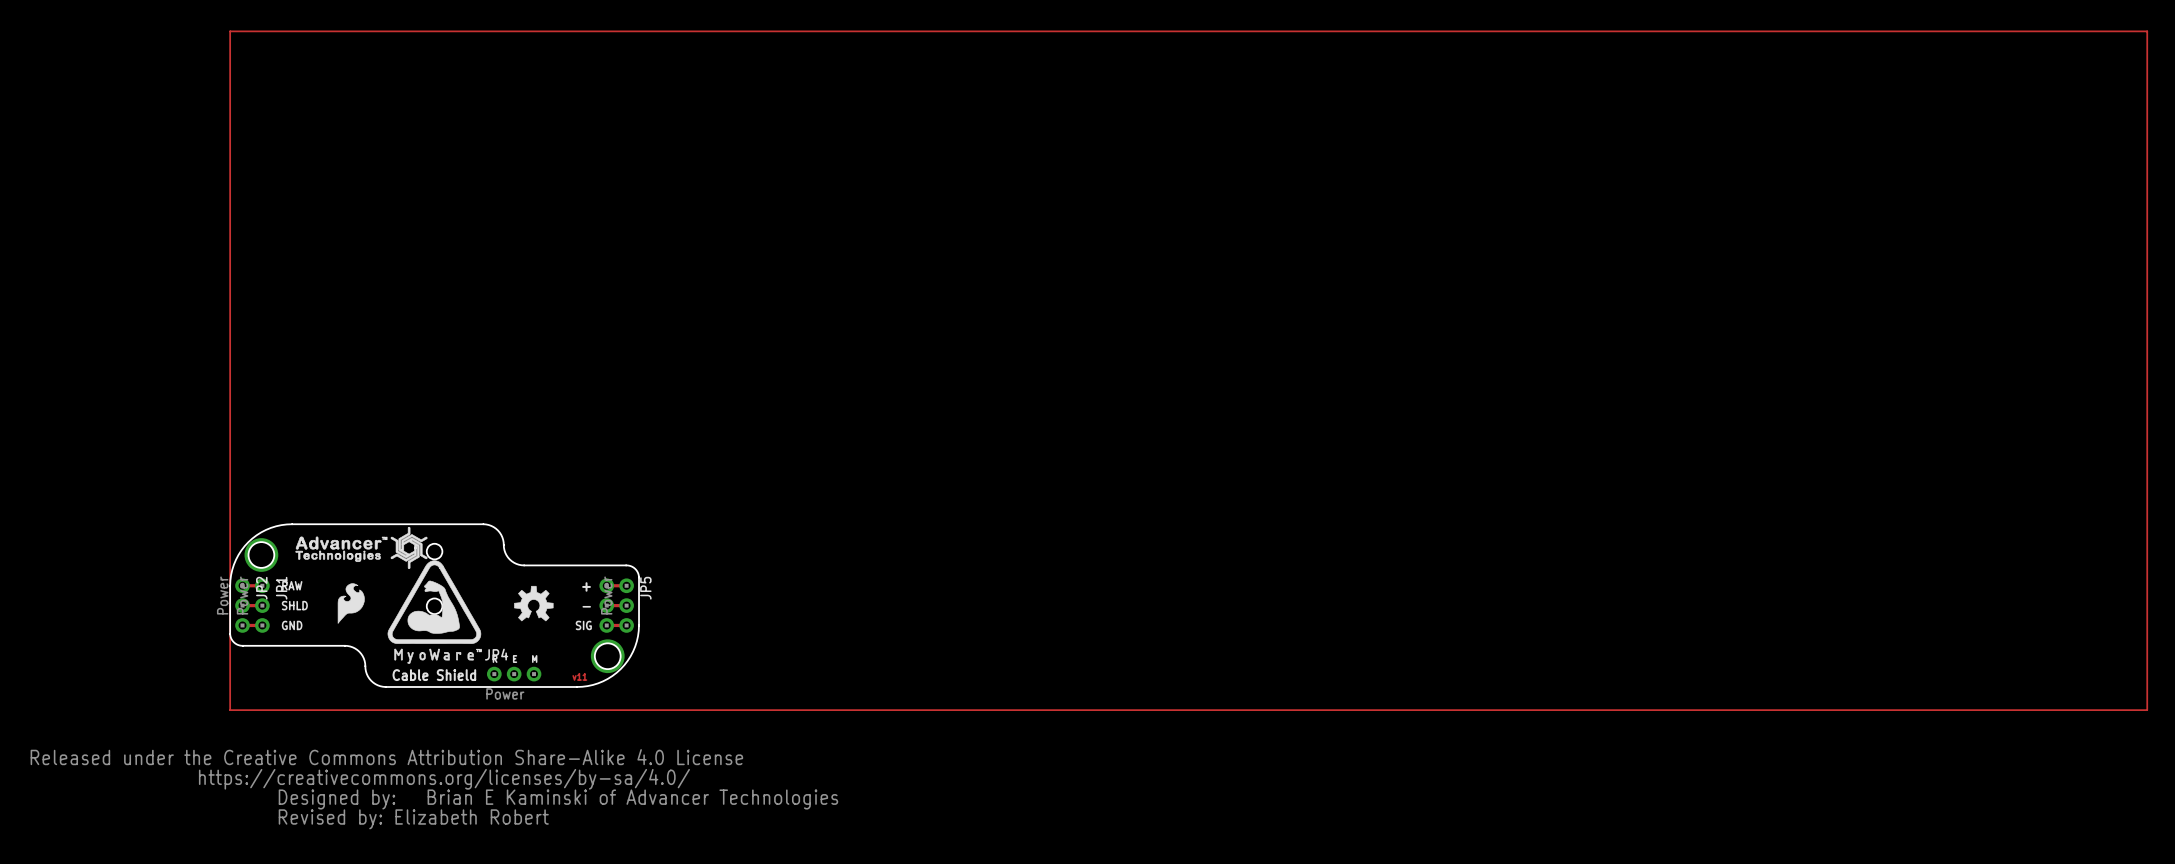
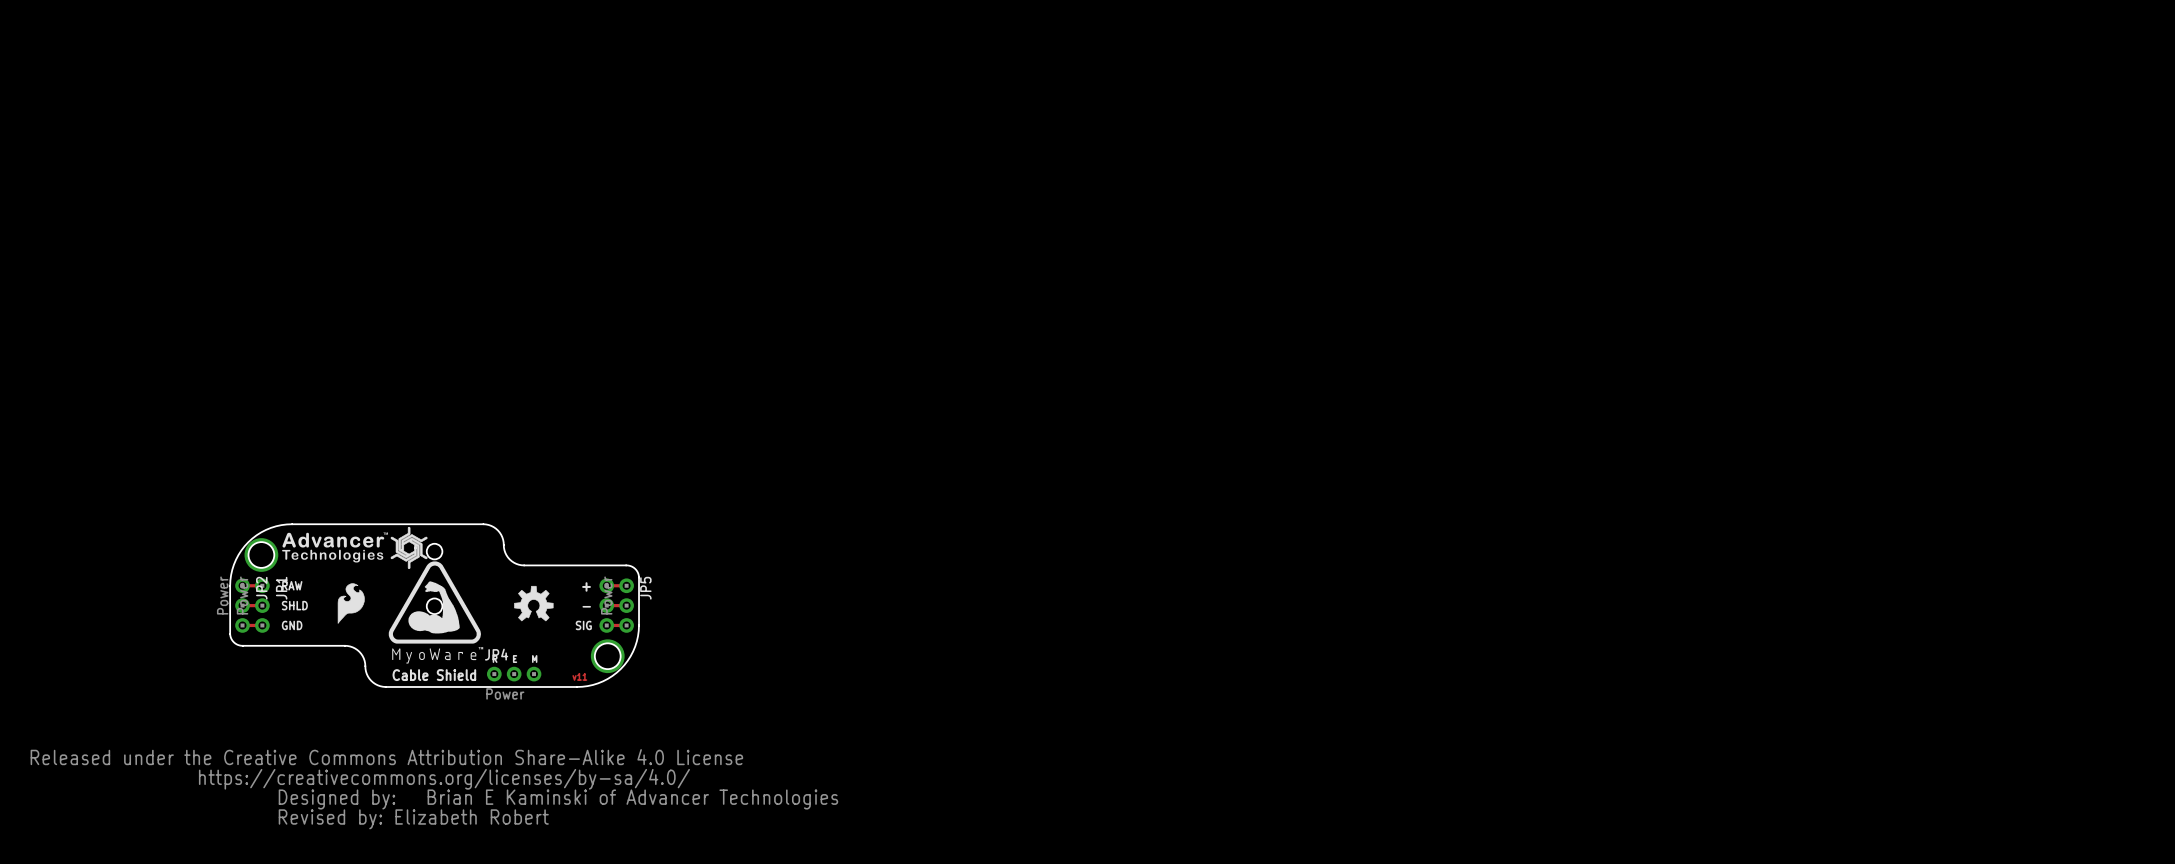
track: (230, 31) (2147, 31) (2147, 710) (230, 710) (230, 31) -> none
drawing: none -> [282, 532, 484, 664]
drawing: [295, 536, 482, 664] -> none

